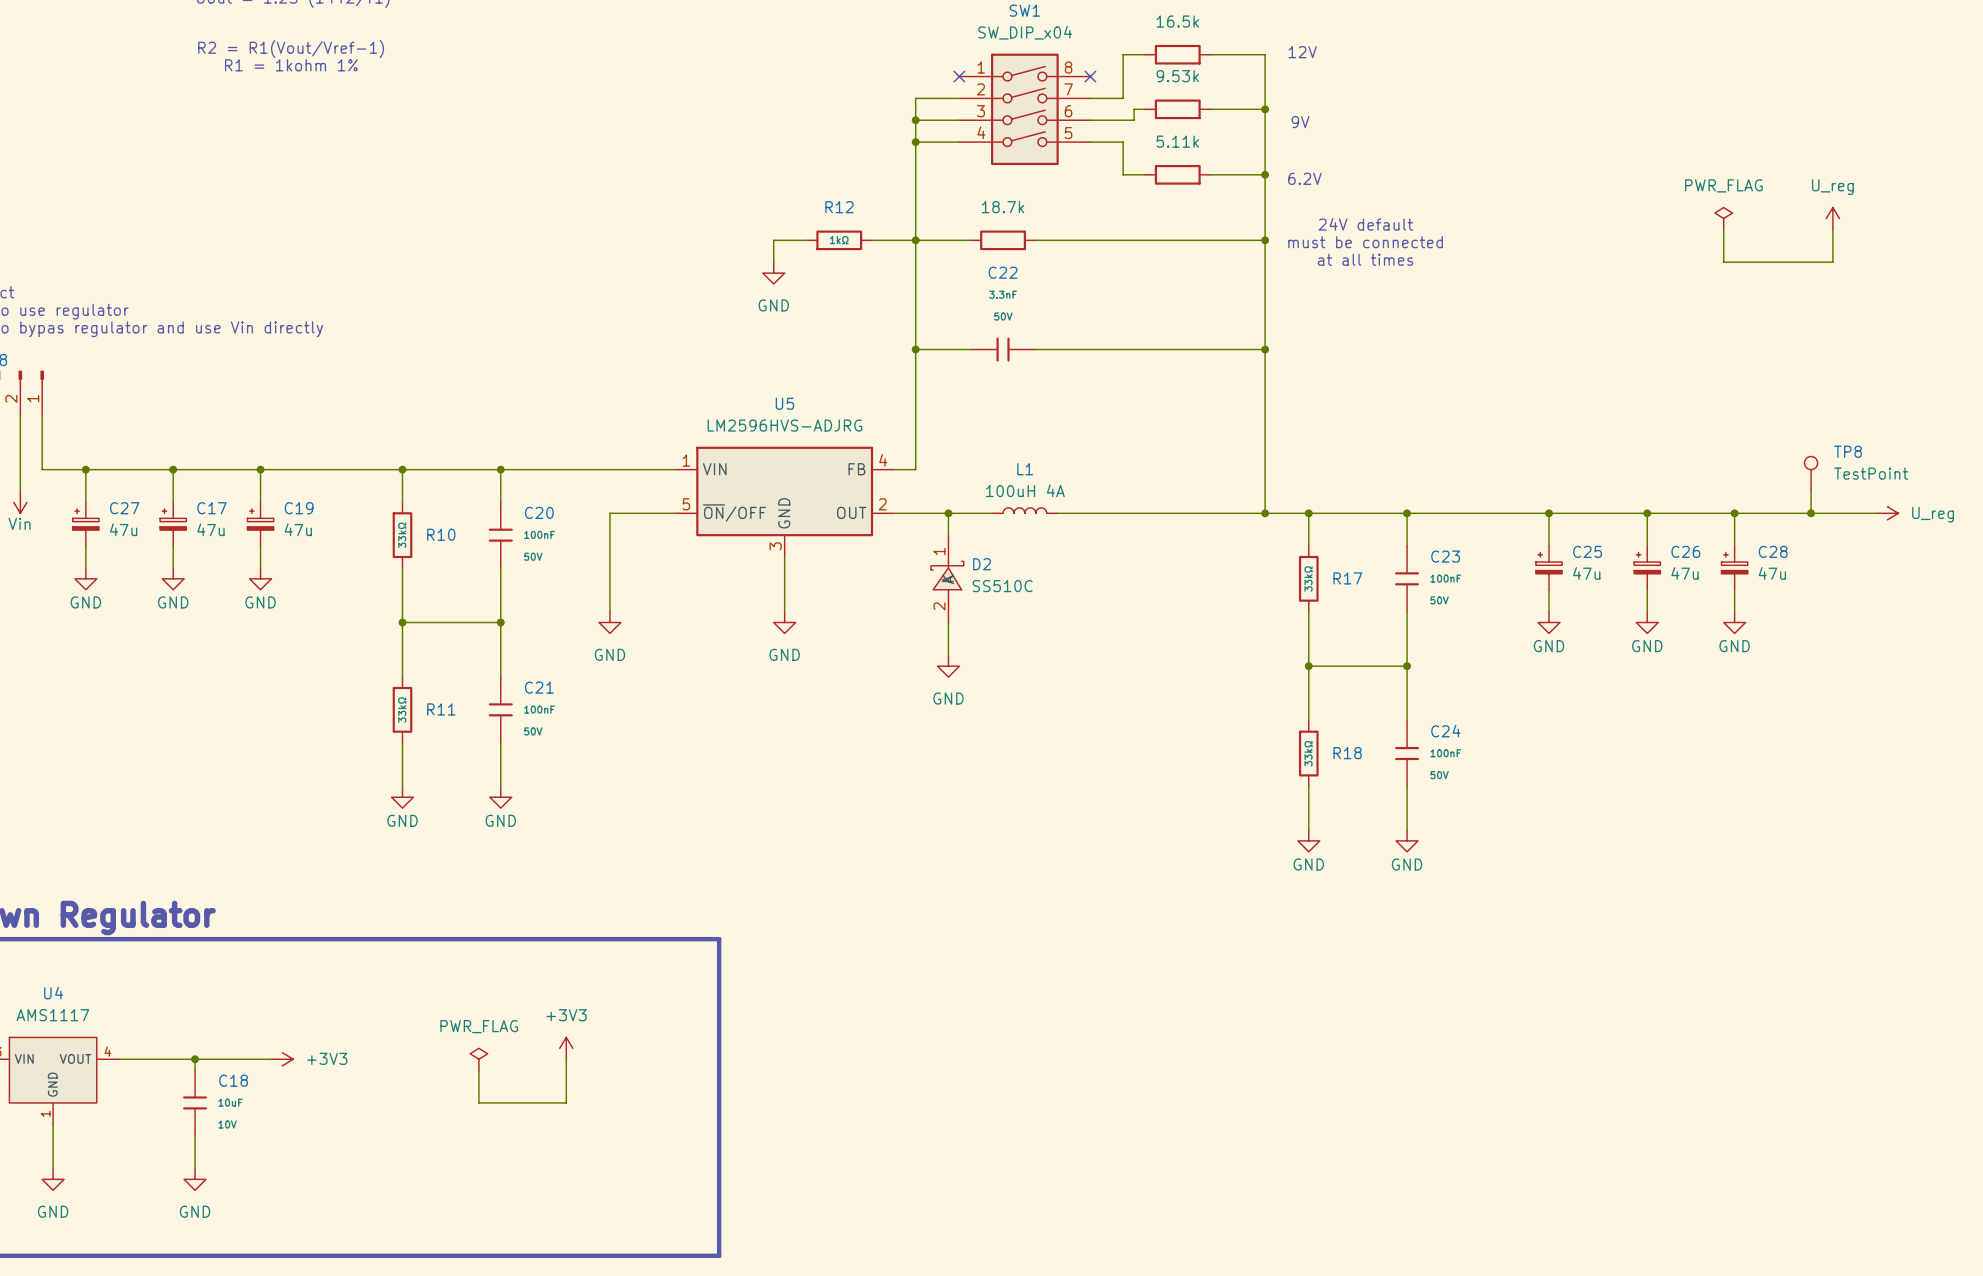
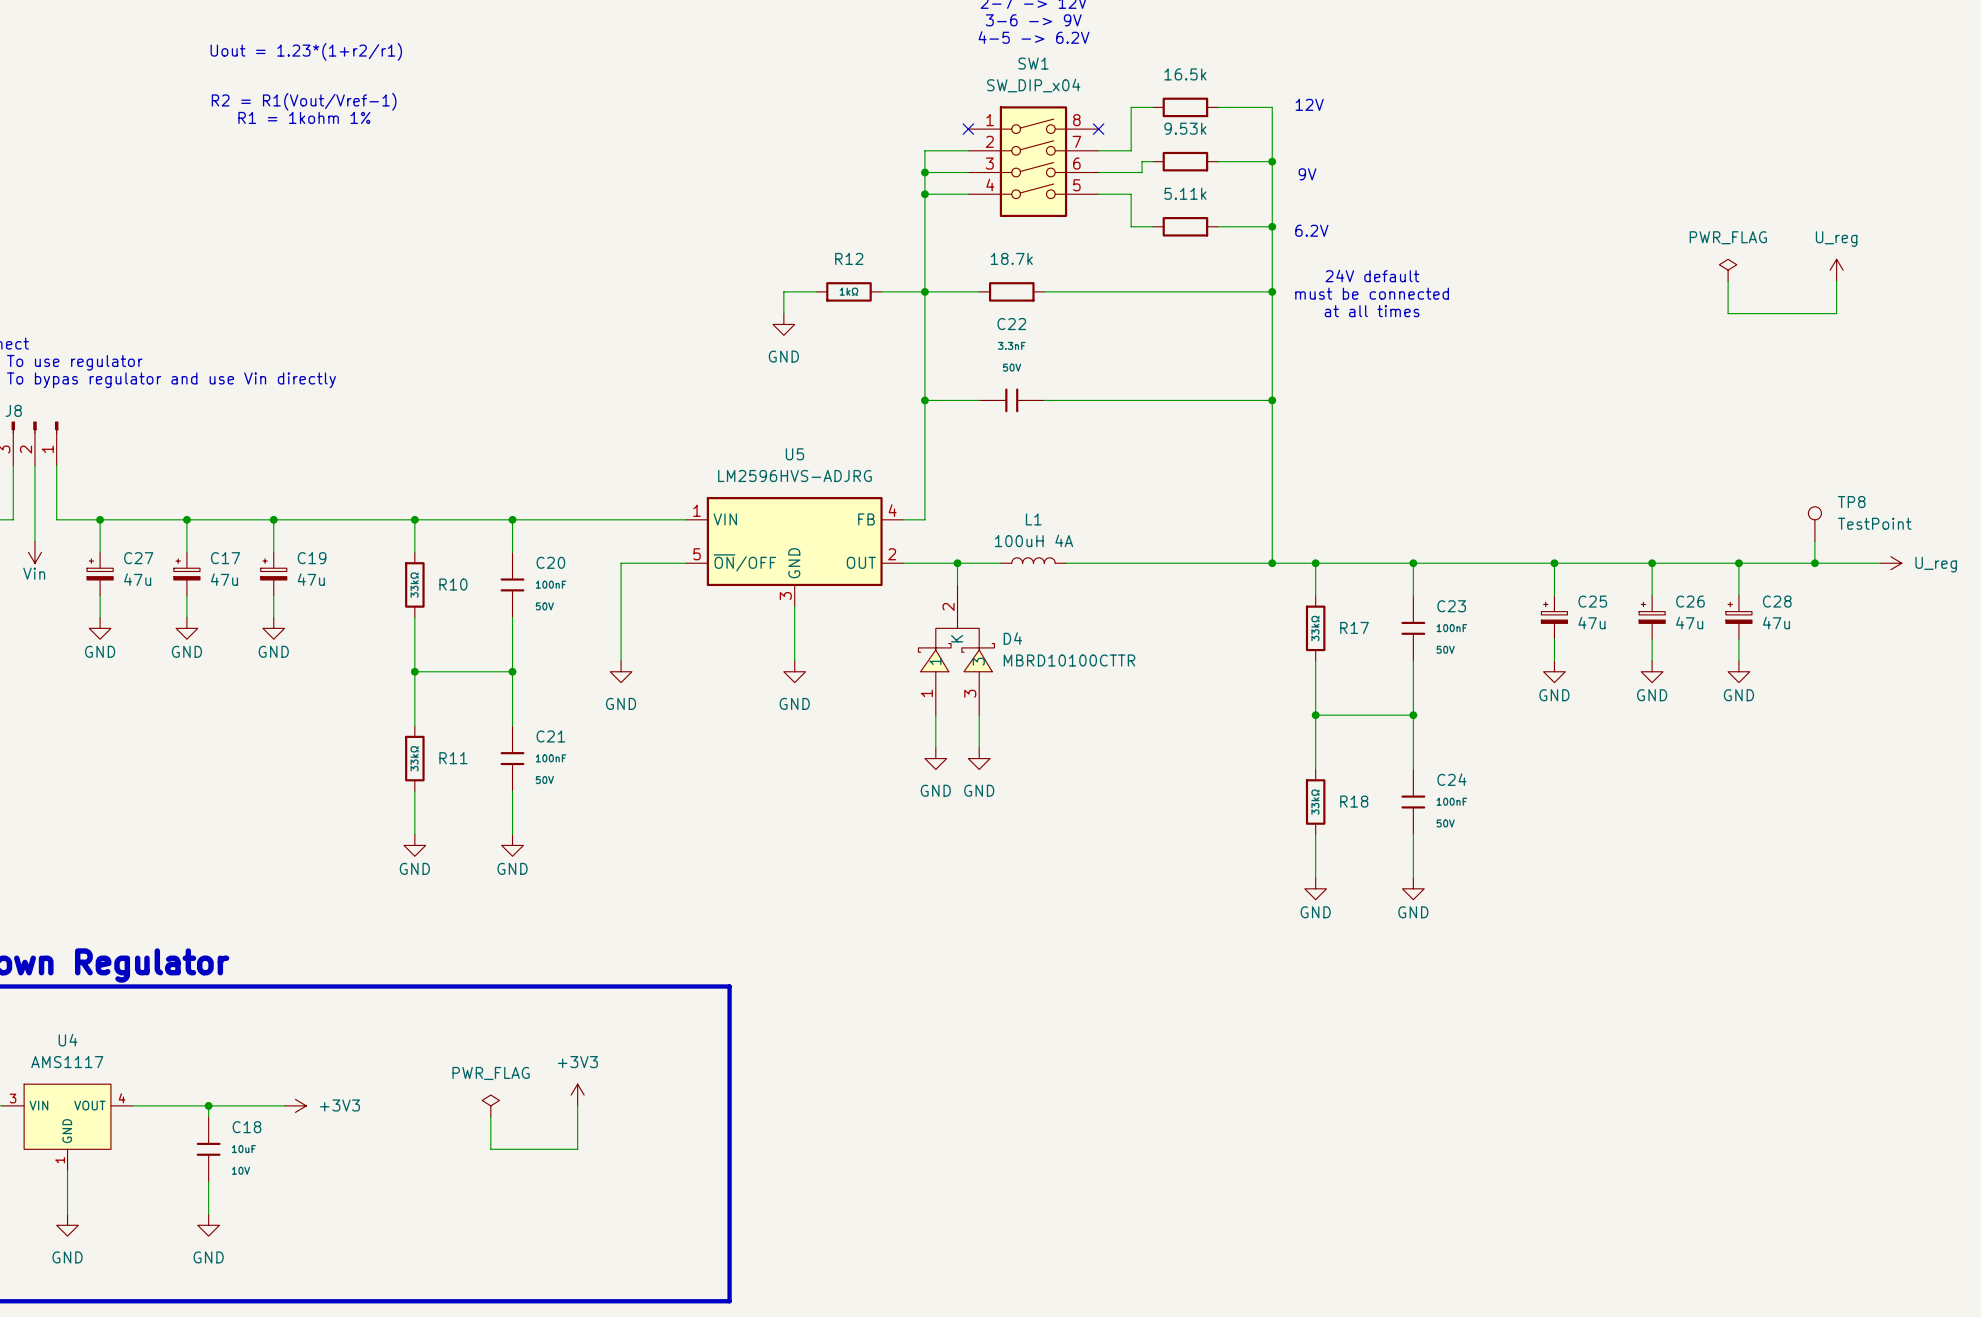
D2: SS510C (947, 578) -> none
D4: none -> MBRD10100CTTR (956, 650)
wire: (948, 622) (948, 655) -> (935, 715) (935, 747)
power symbol: GND (948, 666) -> none
wire: none -> (979, 715) (979, 747)
power symbol: none -> GND (935, 758)
power symbol: none -> GND (979, 758)

